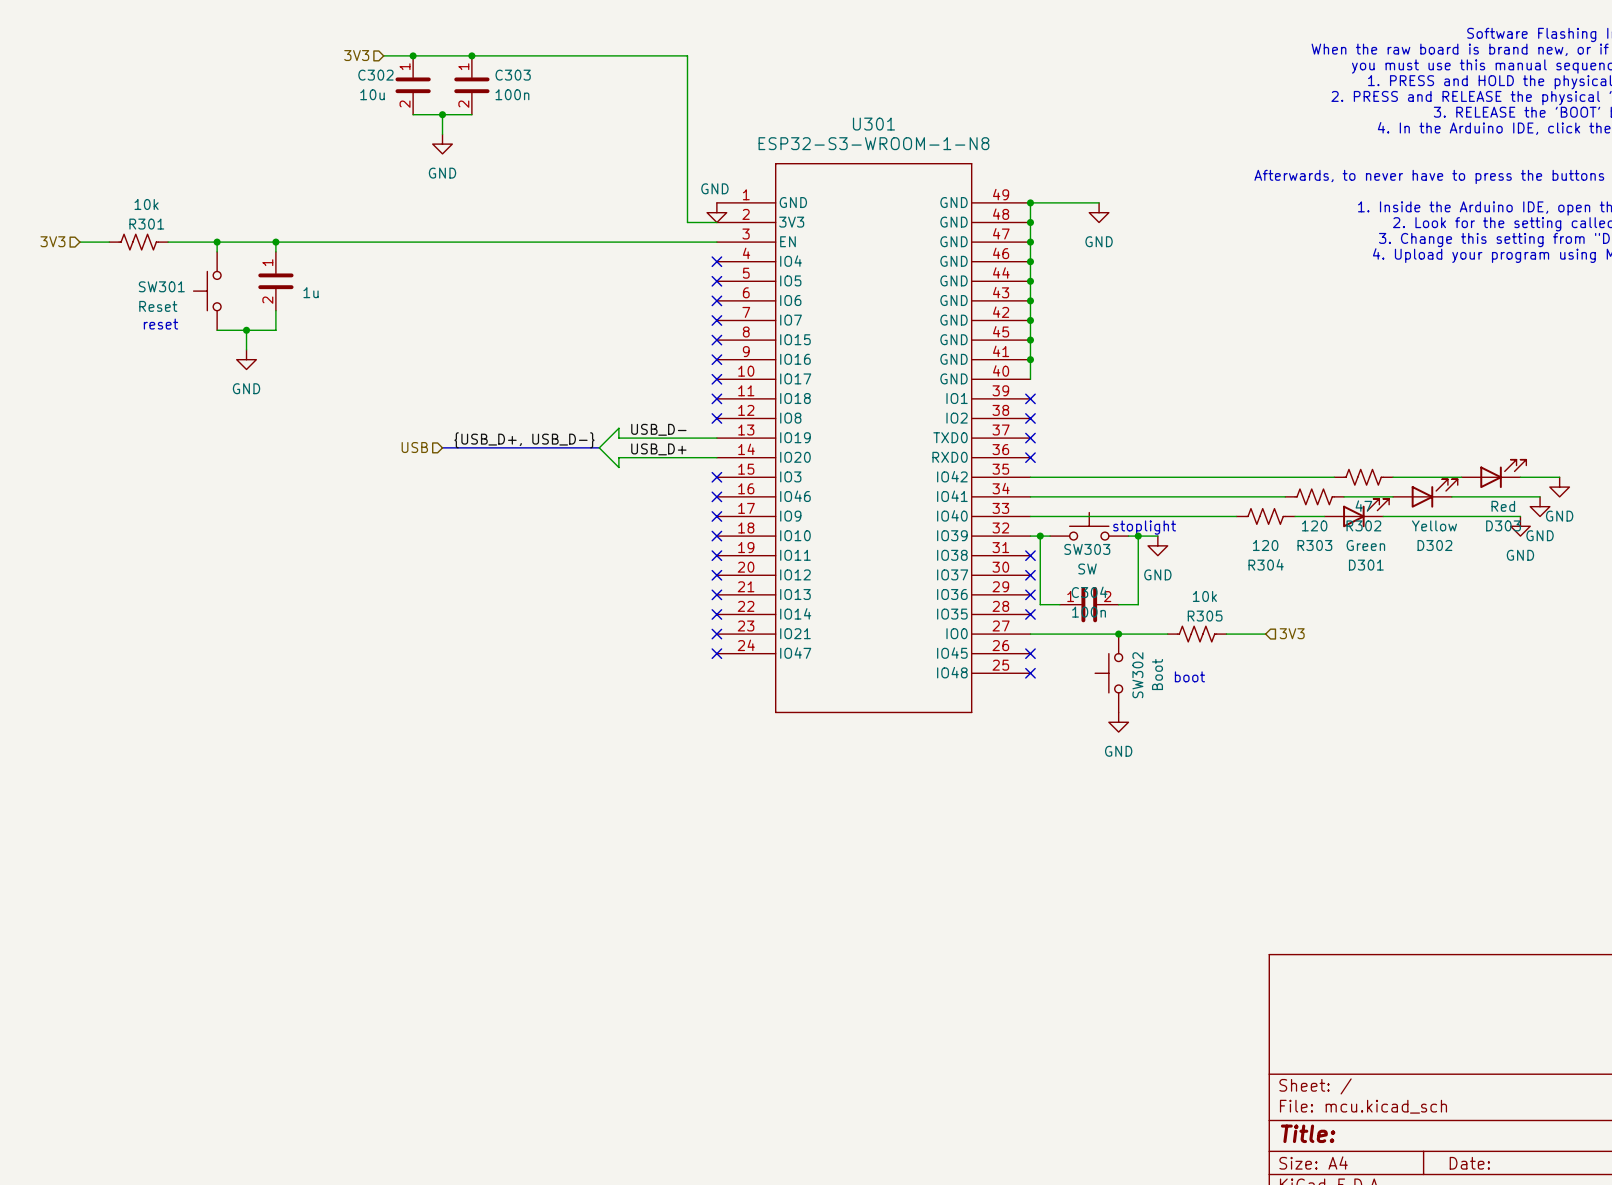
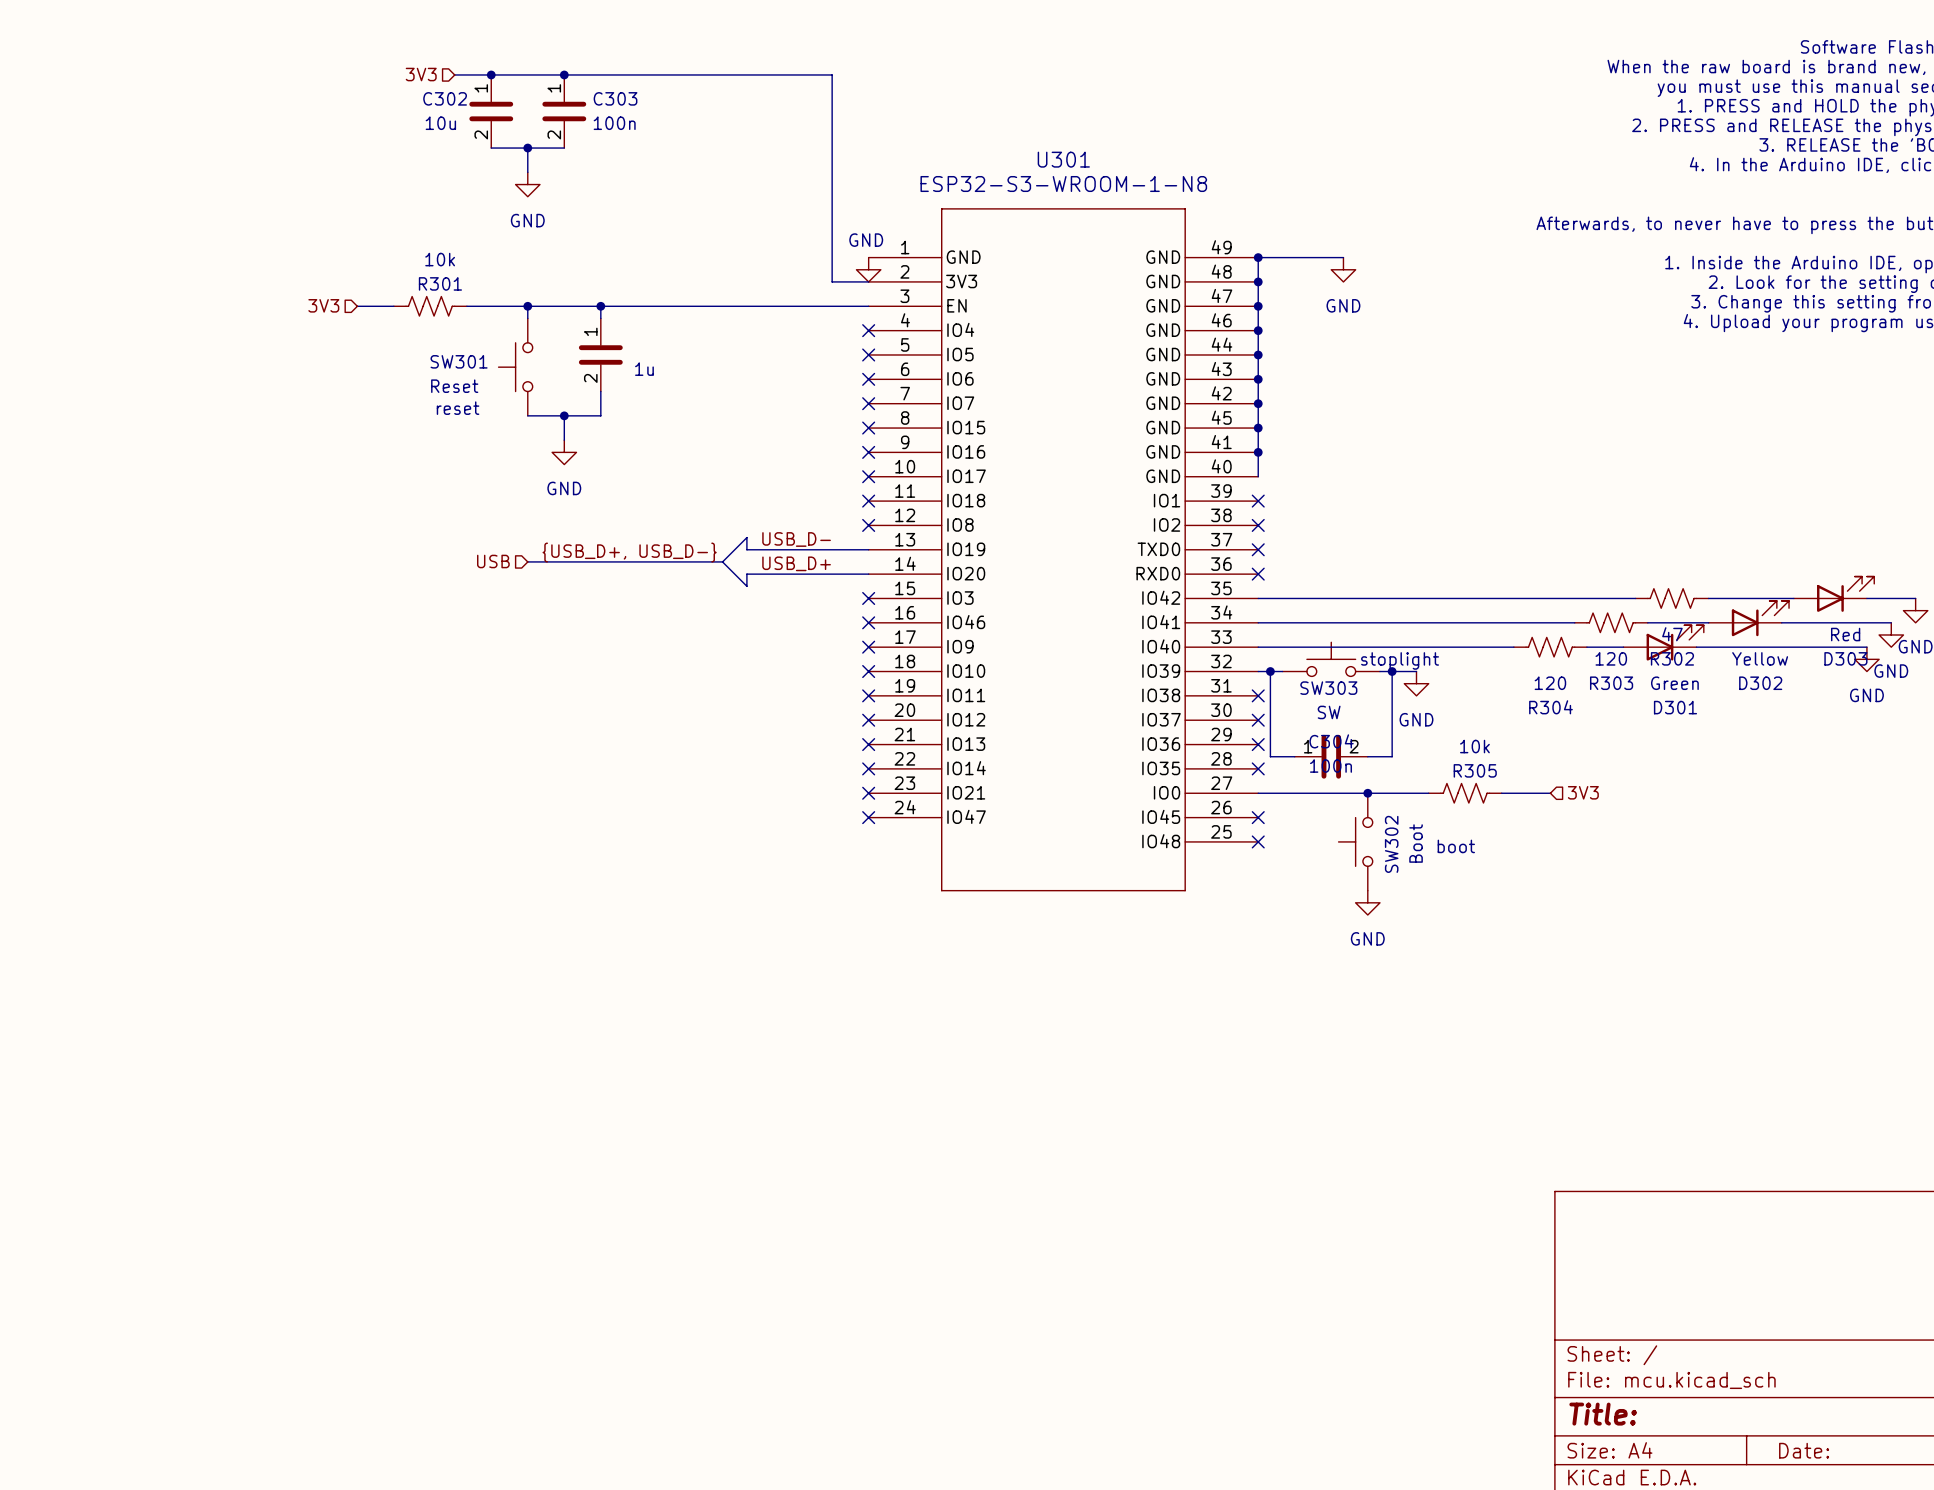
hierarchical label: 3V3 (52, 241) -> none
hierarchical label: none -> 3V3 (323, 305)
wire: (79, 242) (109, 242) -> none
R301 position: (138, 242) -> (430, 306)
wire: (168, 242) (305, 242) -> none
wire: (217, 242) (217, 251) -> none
junction: (217, 242) -> none
wire: (275, 242) (275, 251) -> (527, 306) (527, 318)
junction: (275, 242) -> none
junction: none -> (527, 306)
wire: none -> (600, 306) (600, 318)
junction: none -> (600, 306)
part: 1u (275, 281) -> none
part: none -> 1u (600, 354)
SW301 position: (207, 291) -> (515, 367)
wire: (275, 310) (275, 330) (217, 330) -> none
wire: none -> (600, 391) (600, 415) (527, 415)
text: reset (160, 324) -> none
text: none -> reset (458, 408)
wire: (246, 330) (246, 349) -> none
junction: (246, 330) -> none
wire: none -> (564, 415) (564, 440)
junction: none -> (564, 415)
power symbol: GND (246, 359) -> none
power symbol: none -> GND (564, 452)

